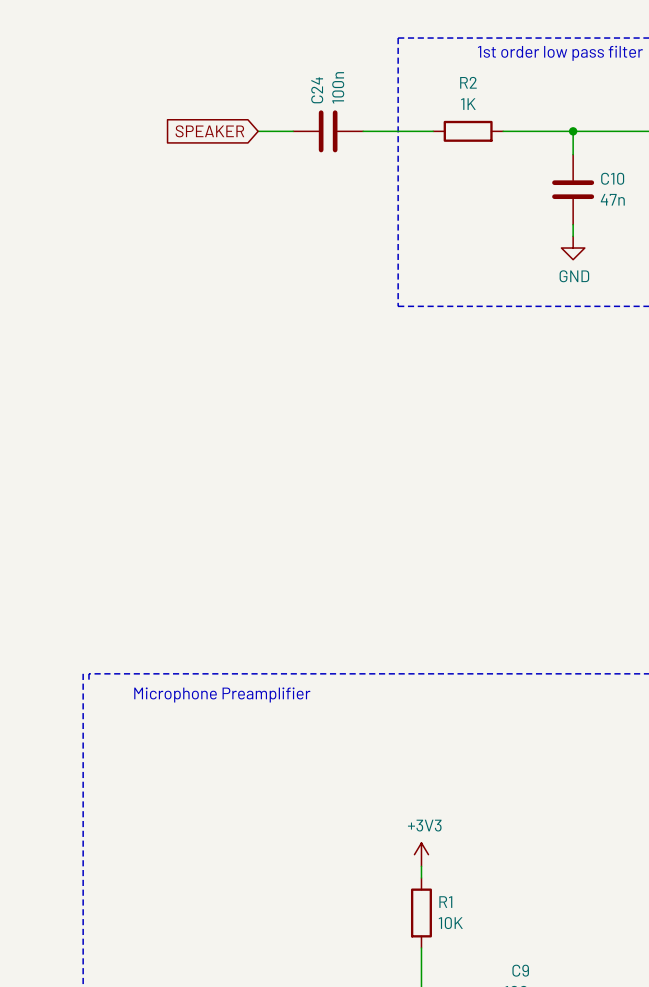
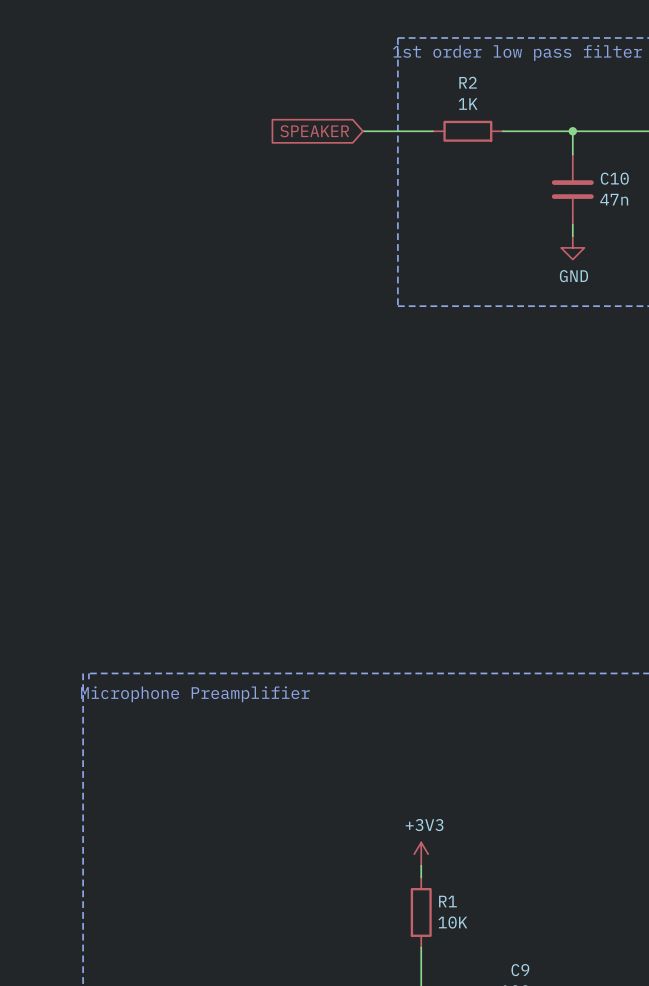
global label position: SPEAKER (209, 131) -> SPEAKER (314, 131)
wire: (258, 131) (293, 131) -> none
C24: 100n (328, 131) -> none

